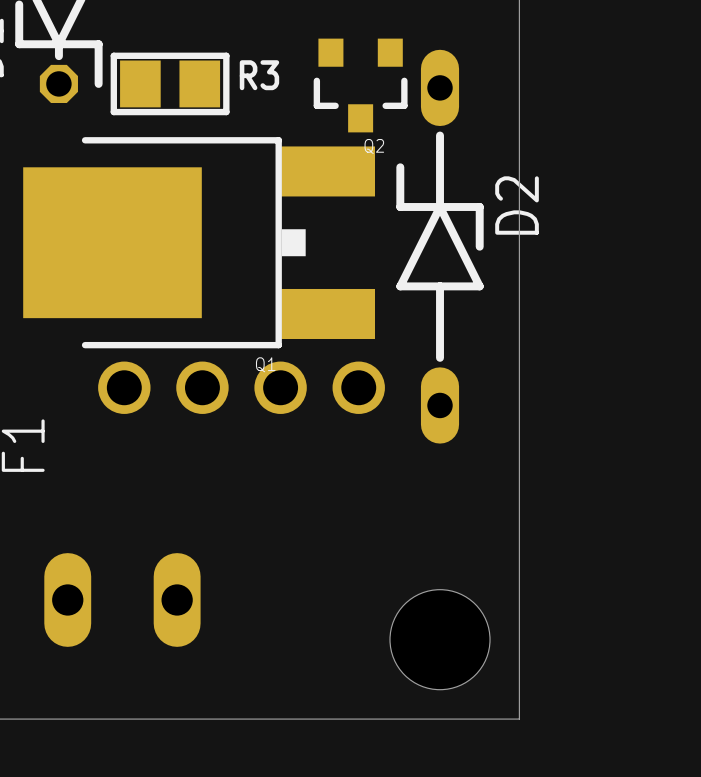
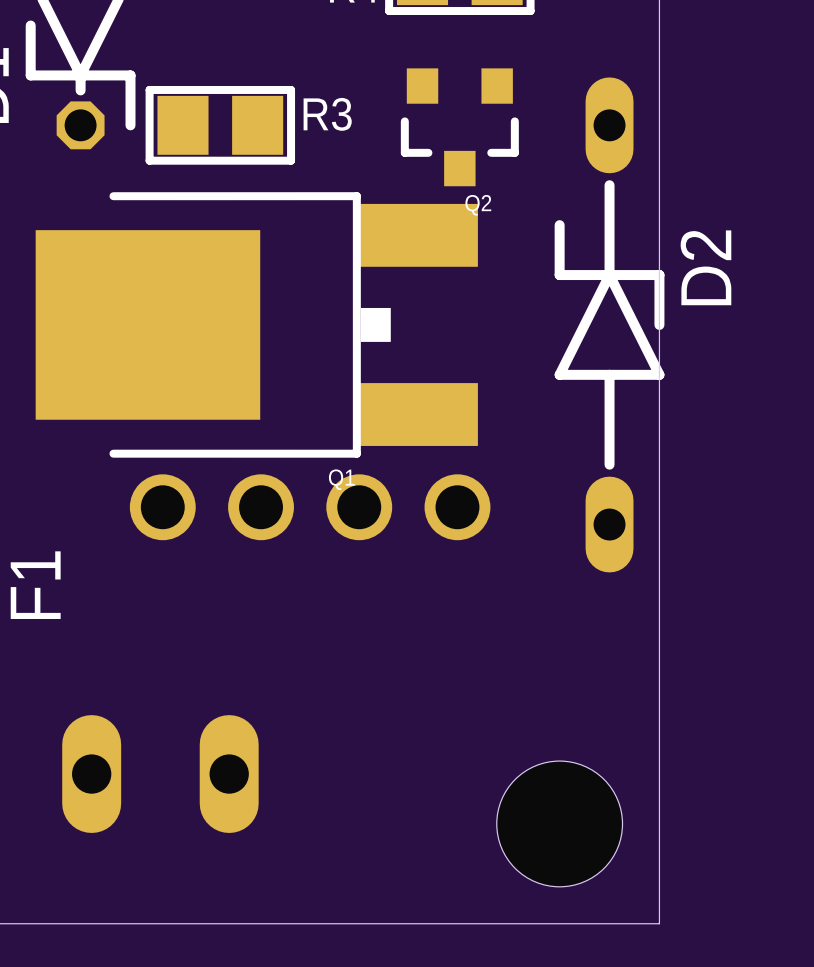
D2 position: (440, 246) -> (609, 324)

